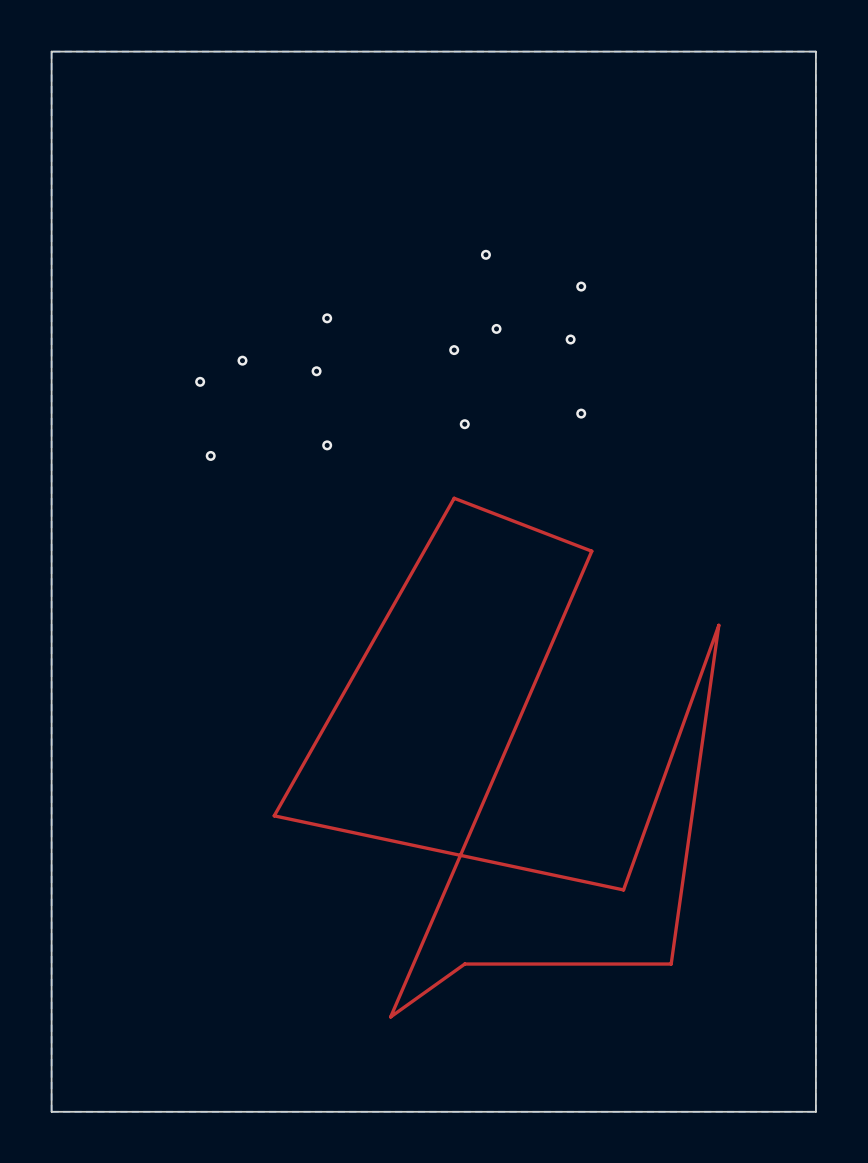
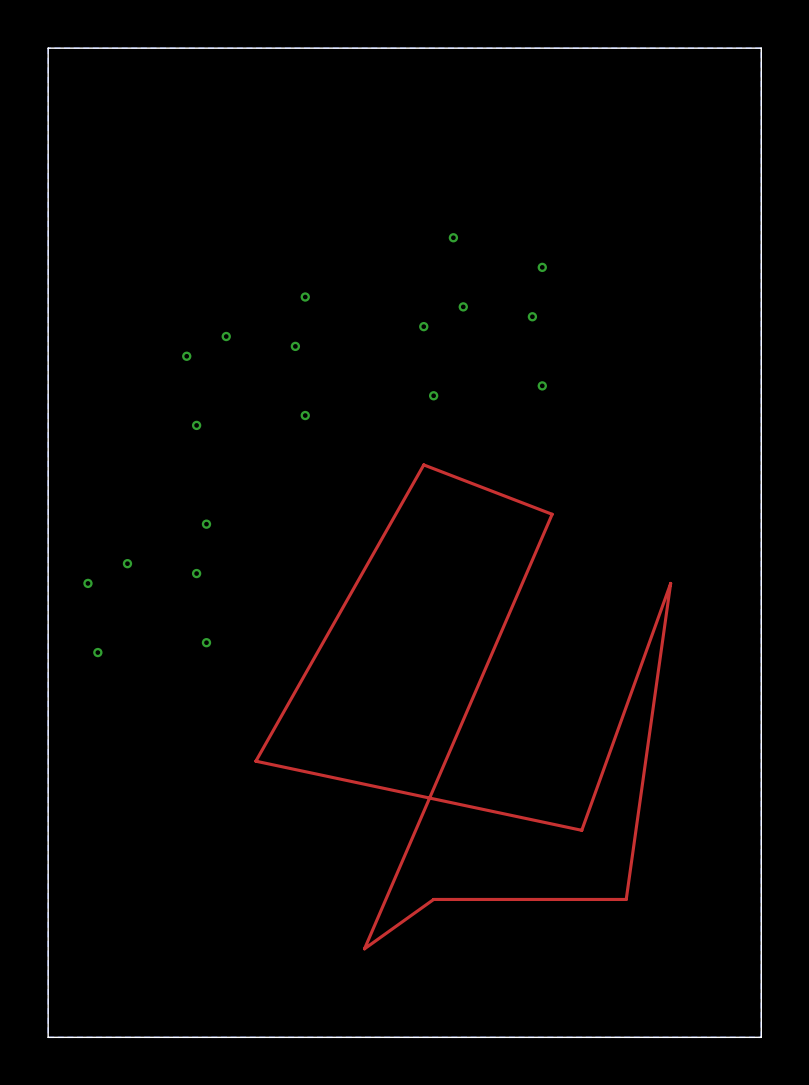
via: none -> (206, 524)
via: none -> (127, 563)
via: none -> (196, 573)
via: none -> (87, 583)
via: none -> (206, 642)
via: none -> (97, 652)

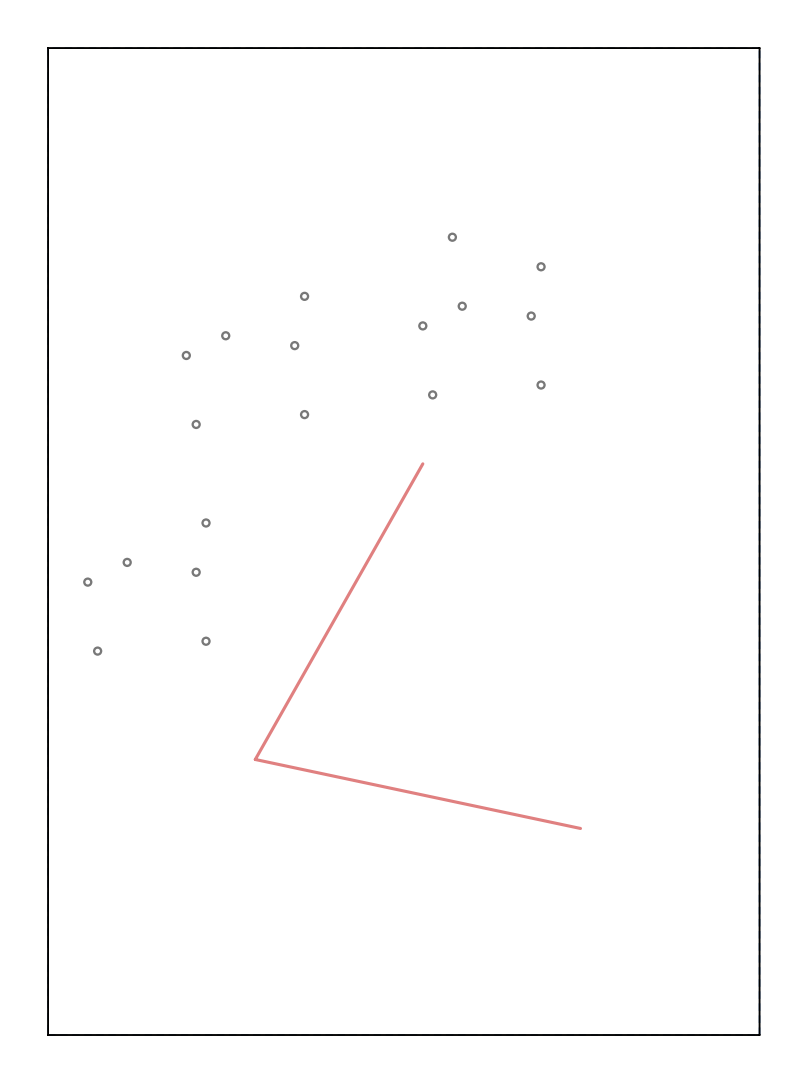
top track: (423, 464) (552, 514) (364, 948) (433, 899) (626, 899) (670, 583) (581, 830) -> none

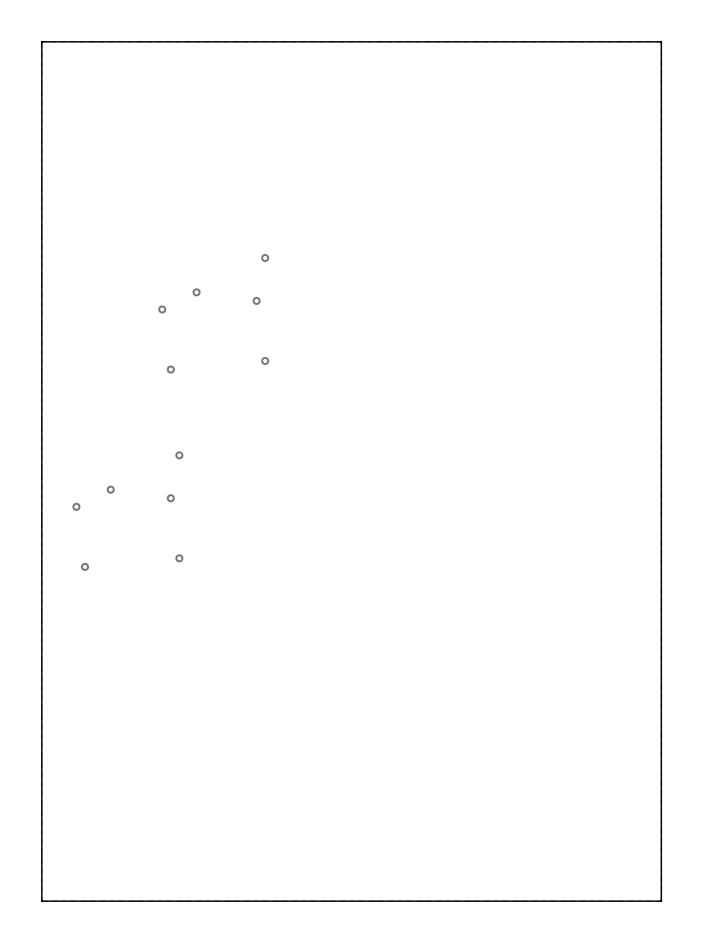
via: (452, 237) -> none
via: (541, 266) -> none
via: (462, 306) -> none
via: (531, 316) -> none
via: (422, 325) -> none
via: (541, 385) -> none
via: (432, 394) -> none
top track: (422, 463) (255, 759) (580, 828) -> none

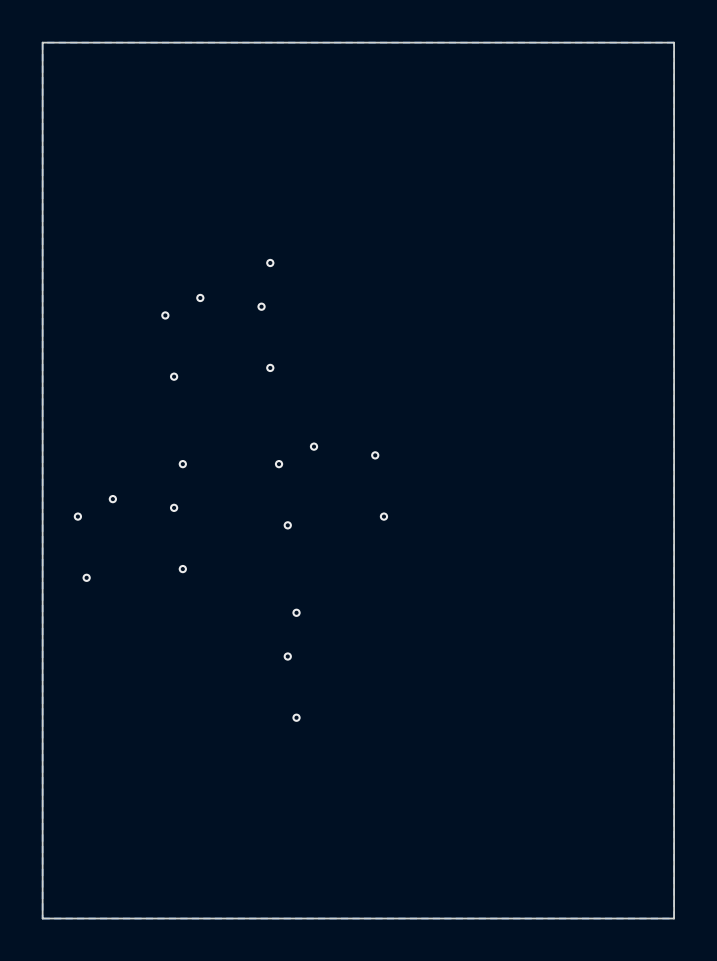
via: none -> (314, 446)
via: none -> (375, 455)
via: none -> (279, 464)
via: none -> (383, 516)
via: none -> (287, 525)
via: none -> (296, 612)
via: none -> (287, 656)
via: none -> (296, 717)

